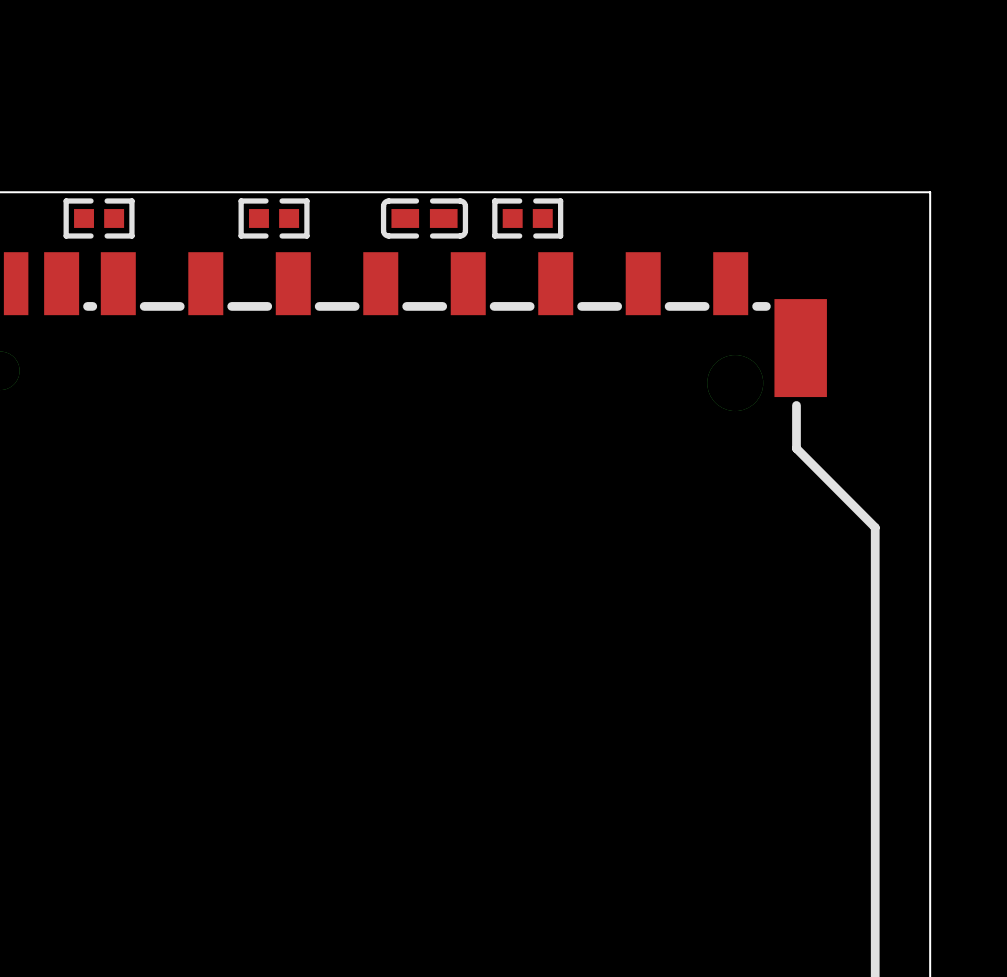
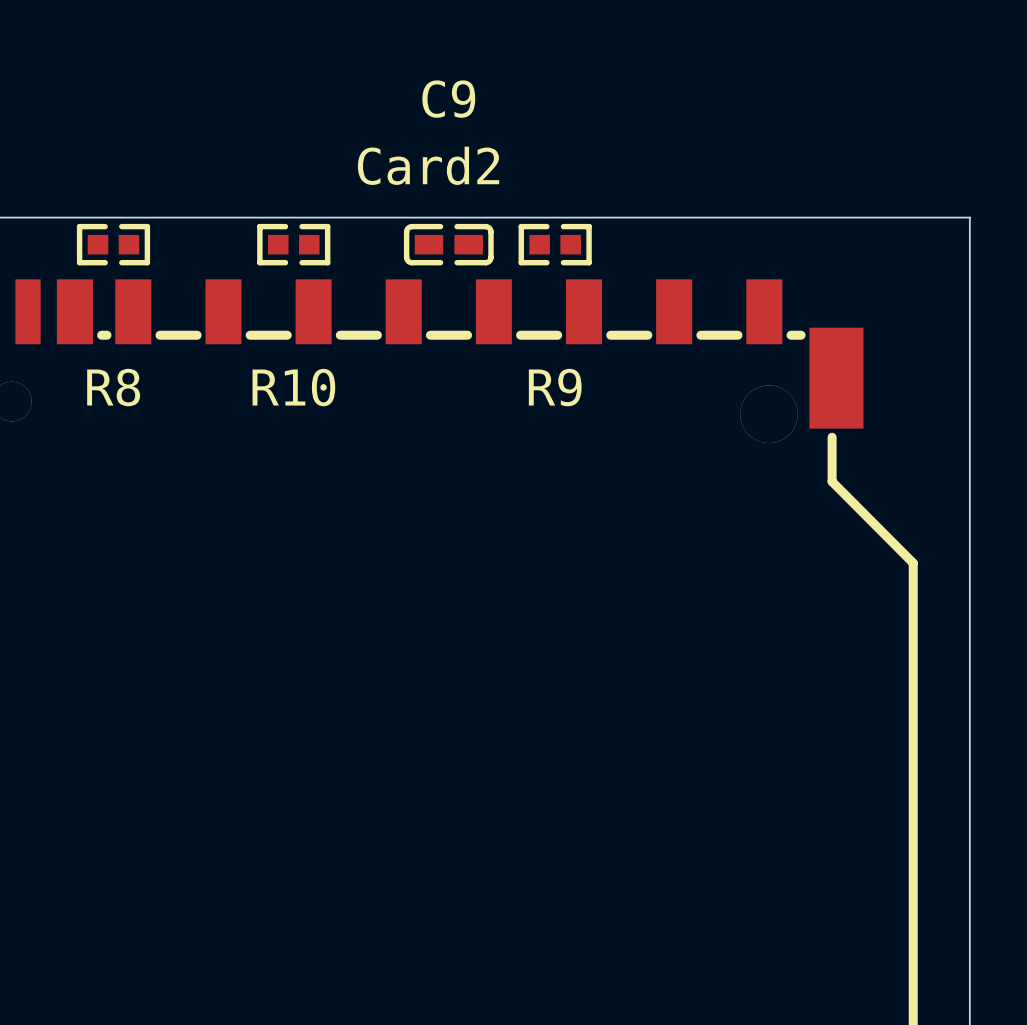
C9 name: none -> C9 (448, 99)
Card2 name: none -> Card2 (428, 165)
R8 name: none -> R8 (113, 387)
R10 name: none -> R10 (293, 387)
R9 name: none -> R9 (555, 387)

